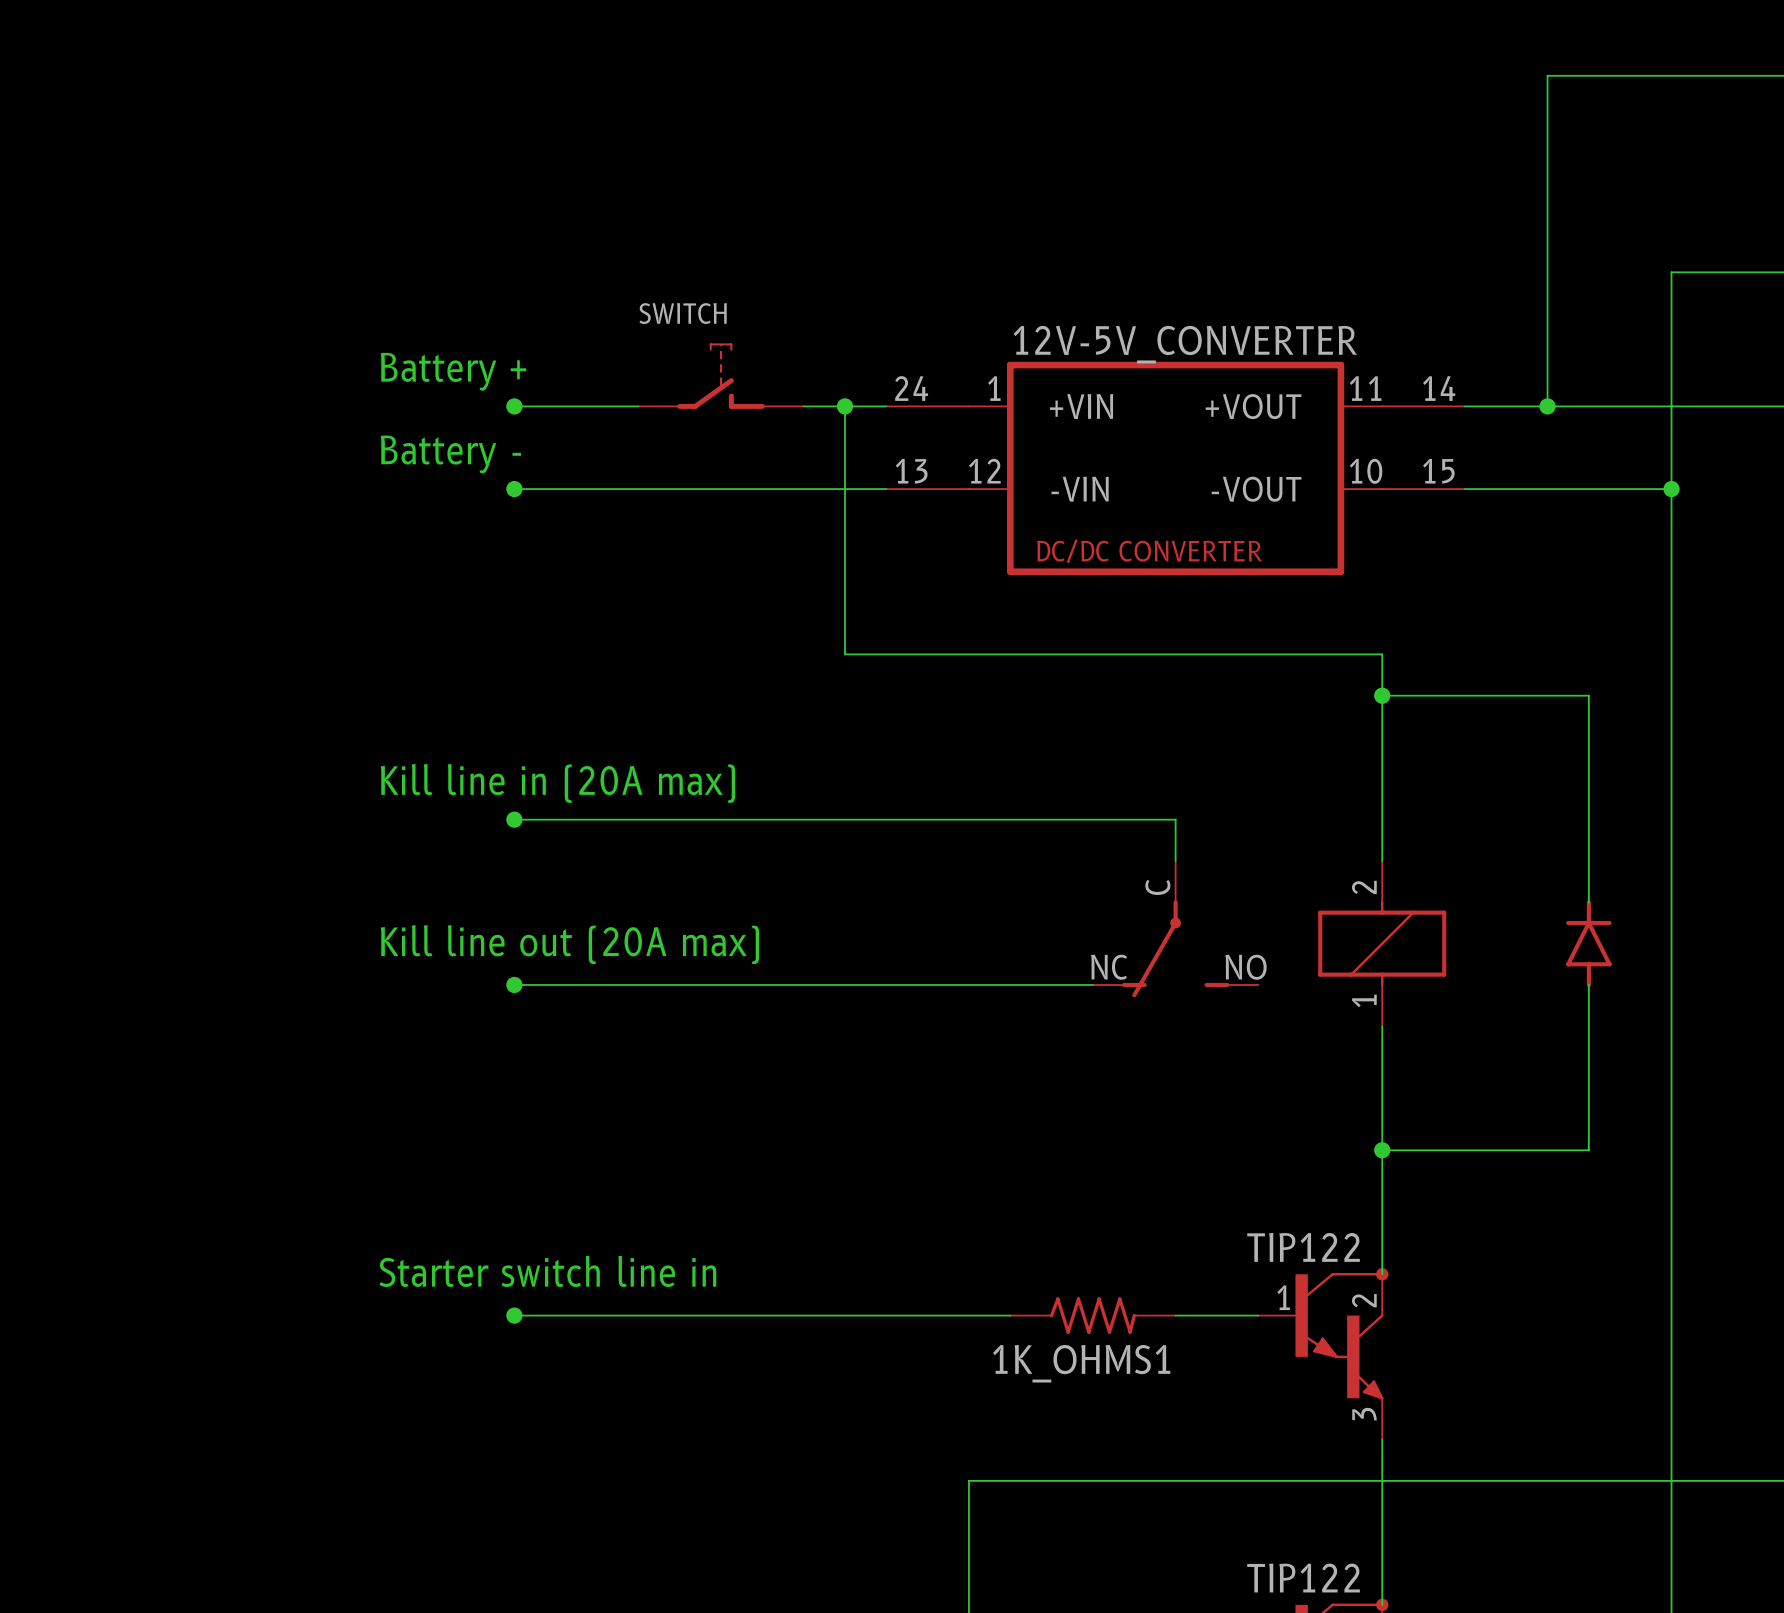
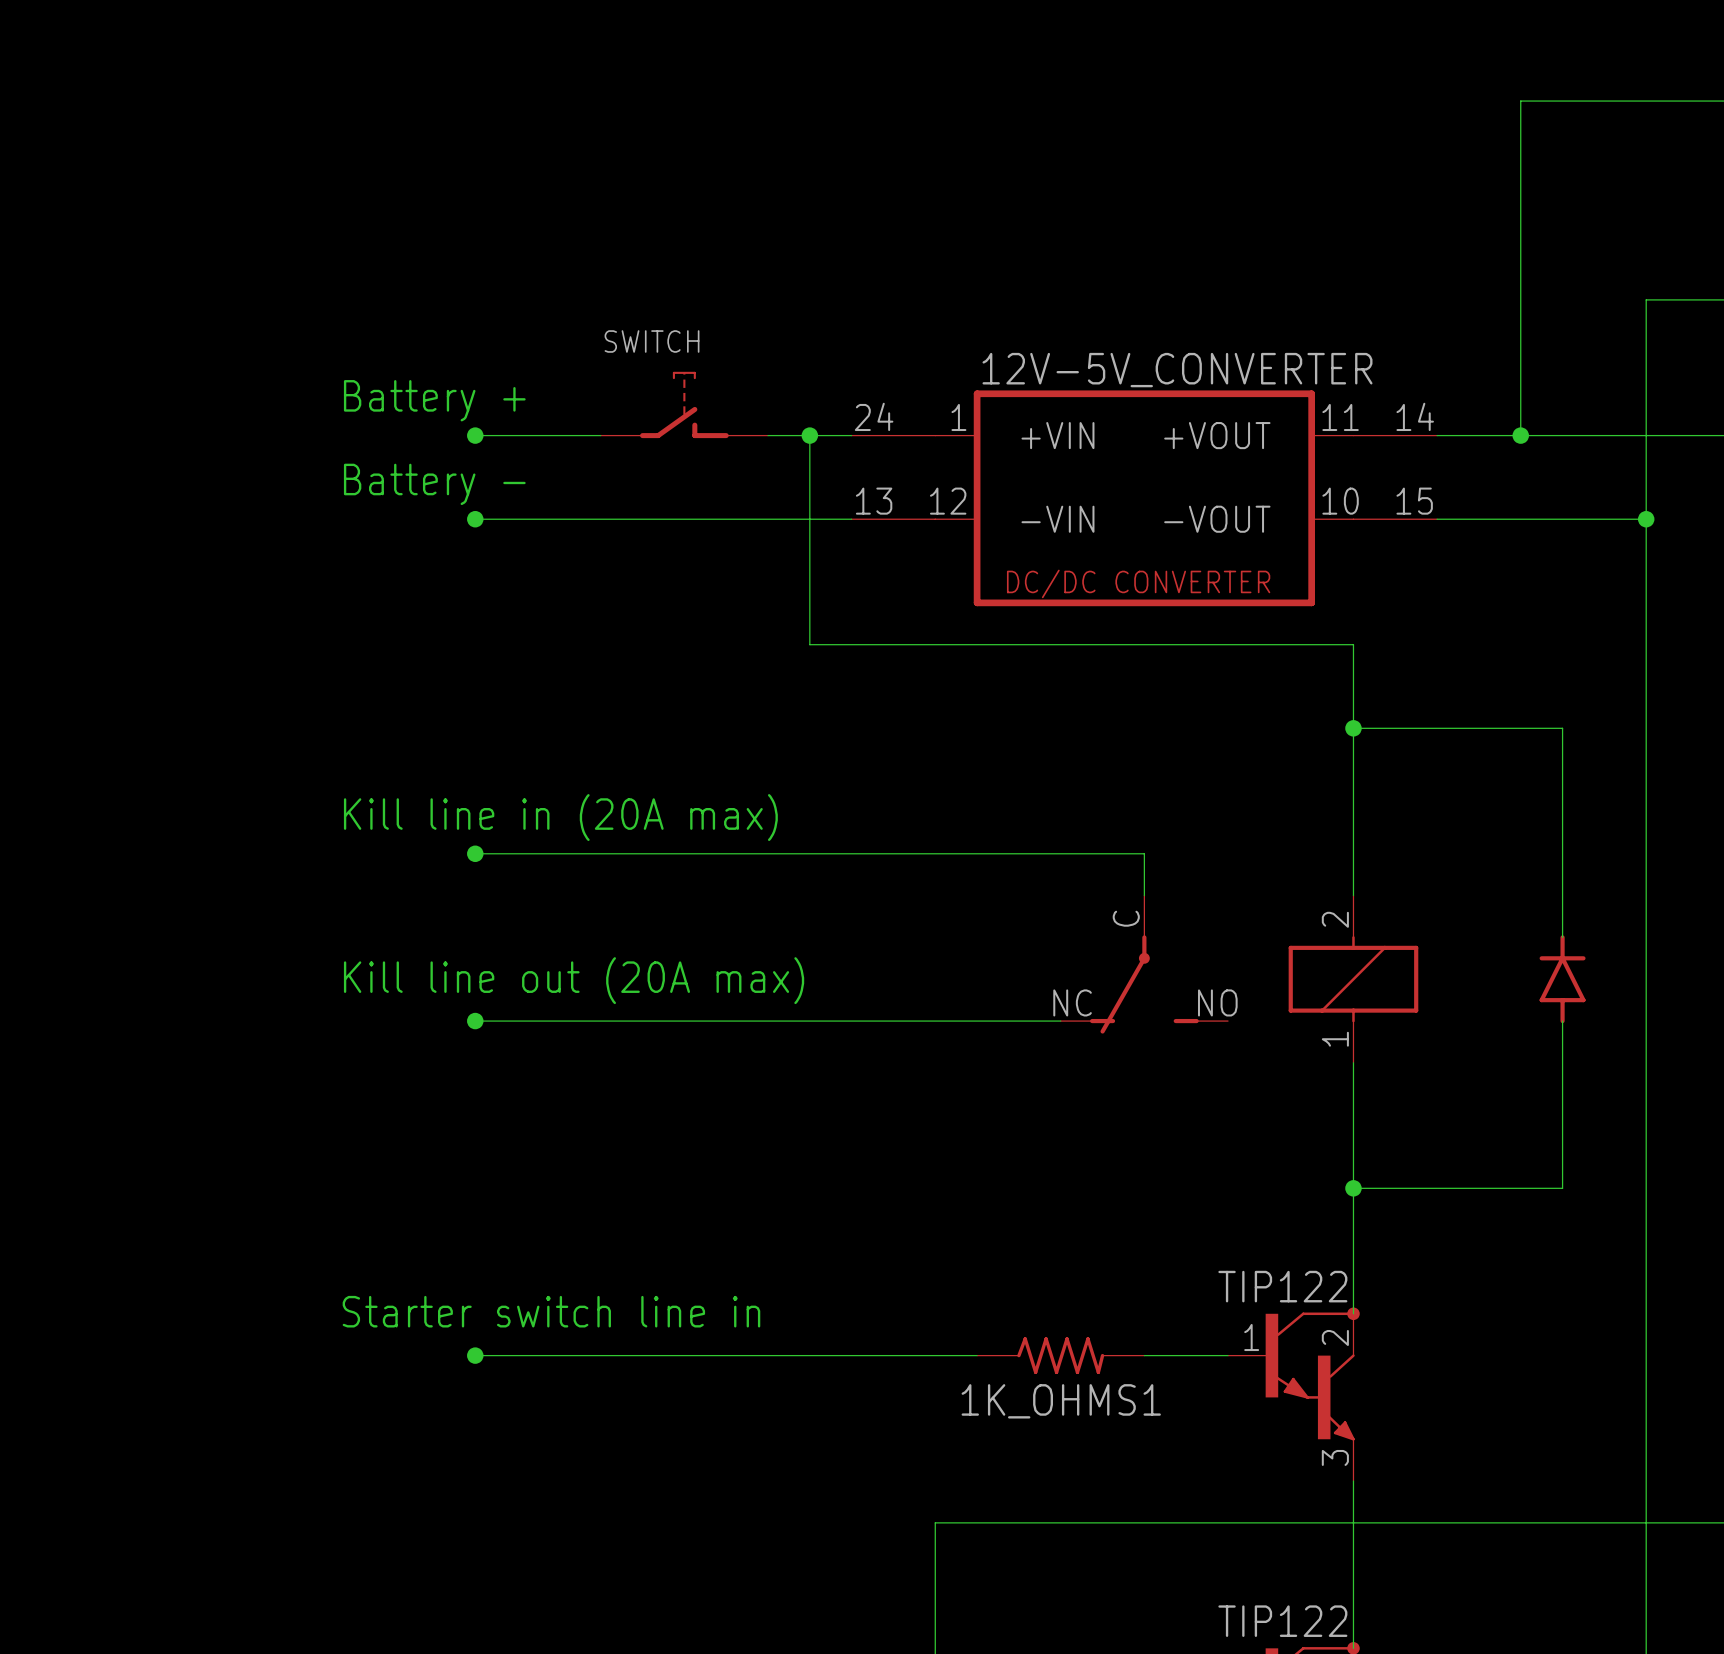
wire: (845, 613) (845, 654) (1382, 654) -> (809, 644) (1353, 644) (1353, 686)

